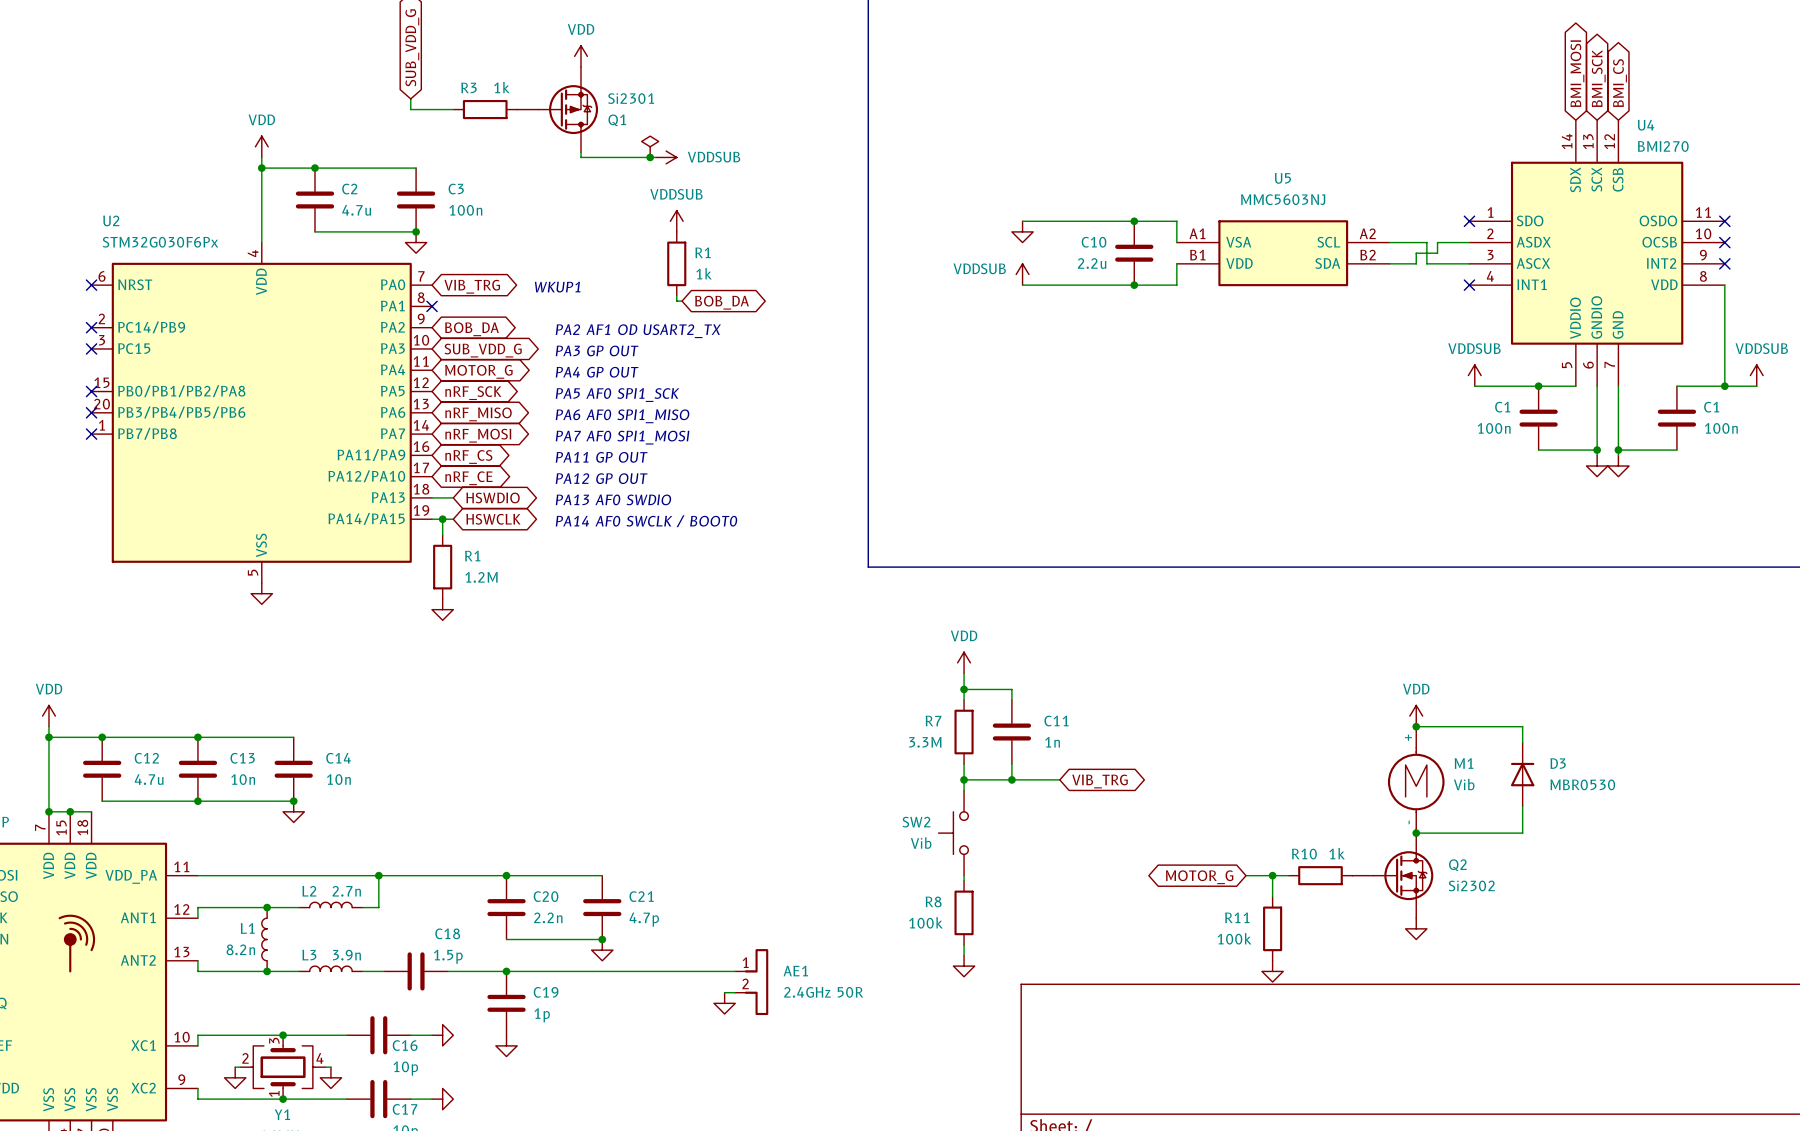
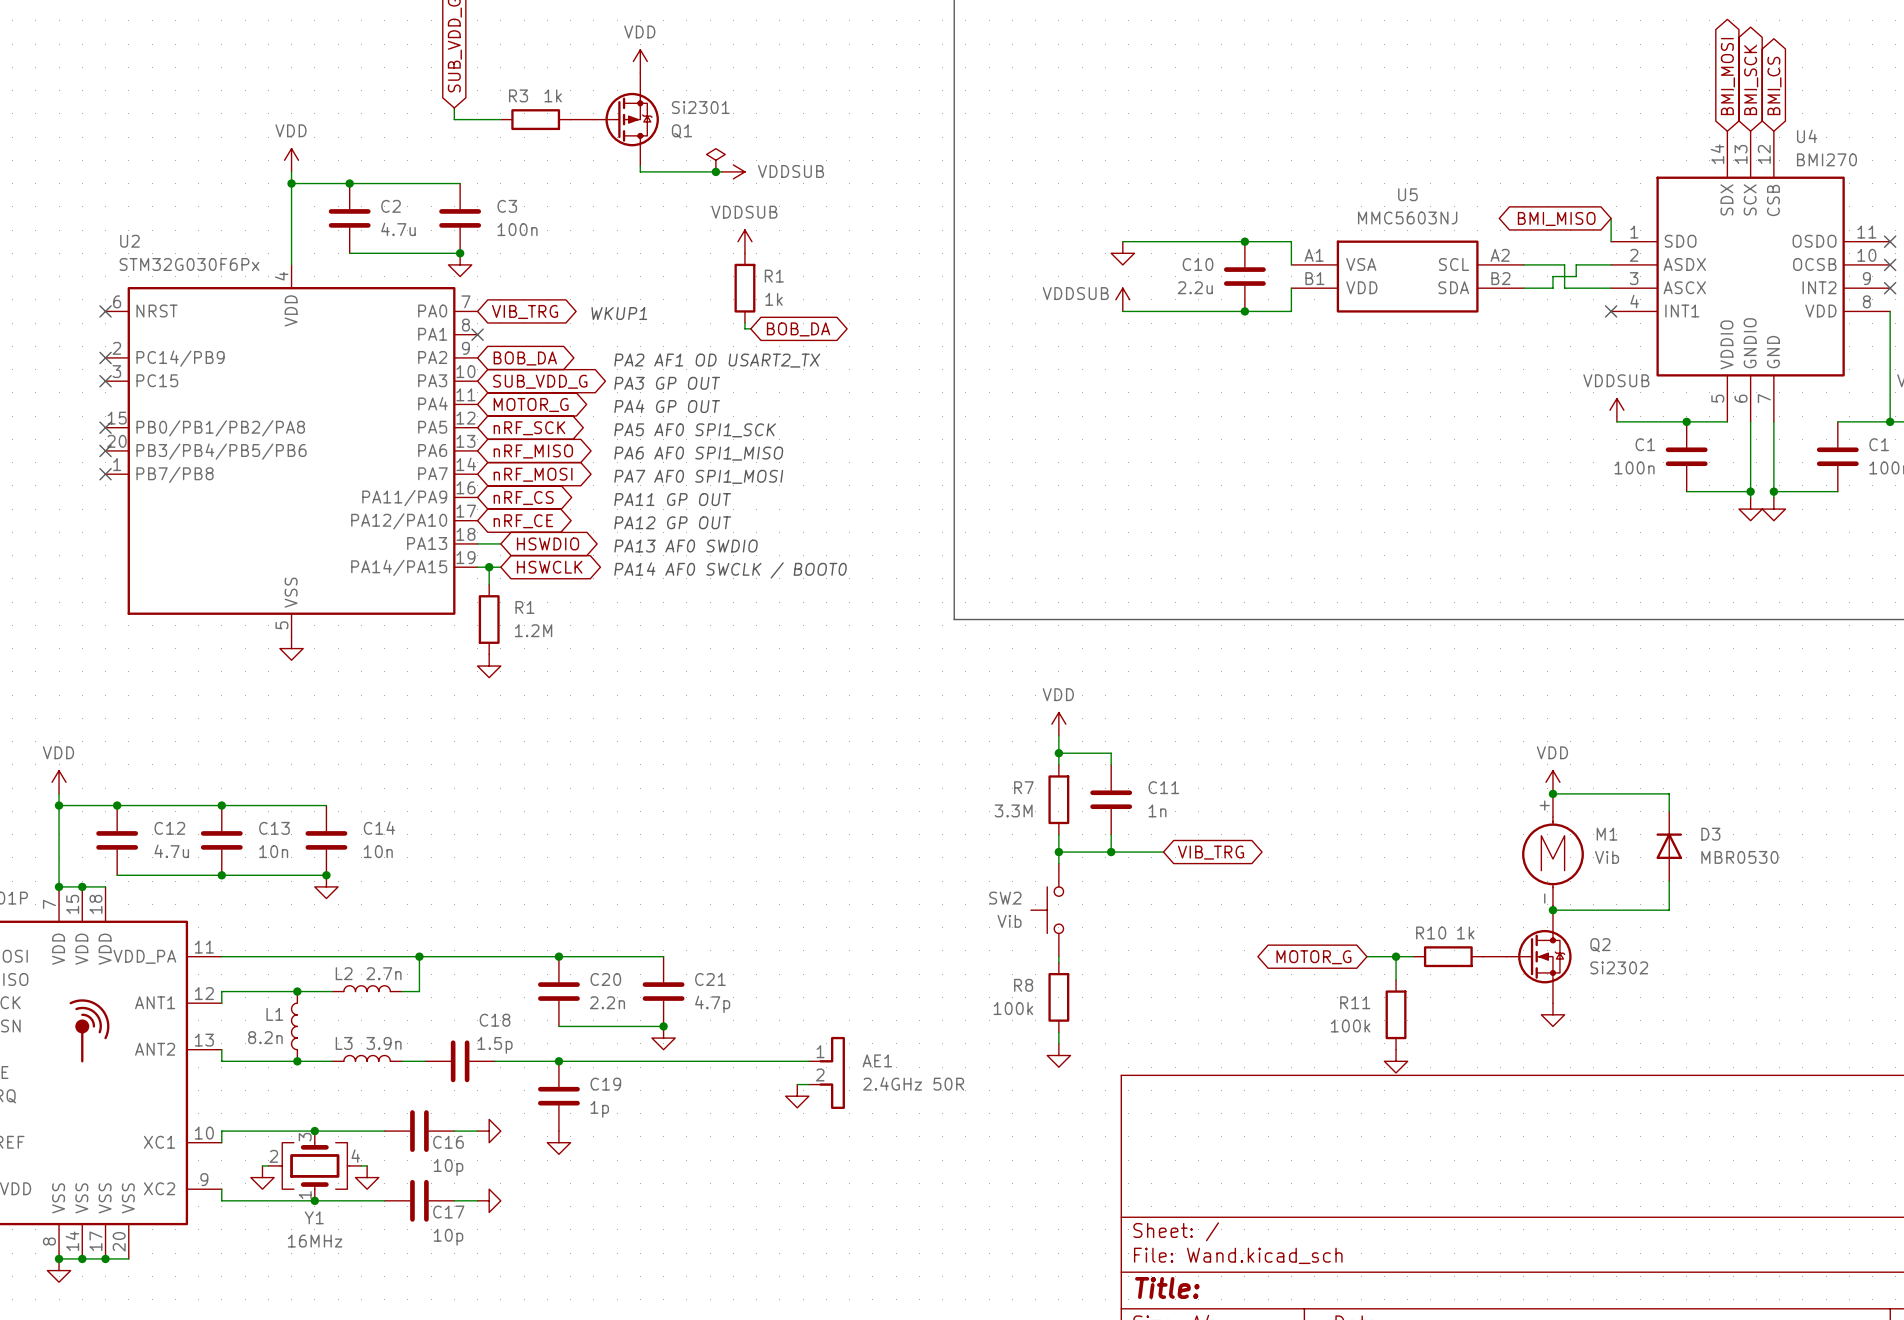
wire: none -> (1611, 218) (1611, 241)
global label: none -> BMI_MISO (1556, 218)
no-connect mark: (1469, 221) -> none

